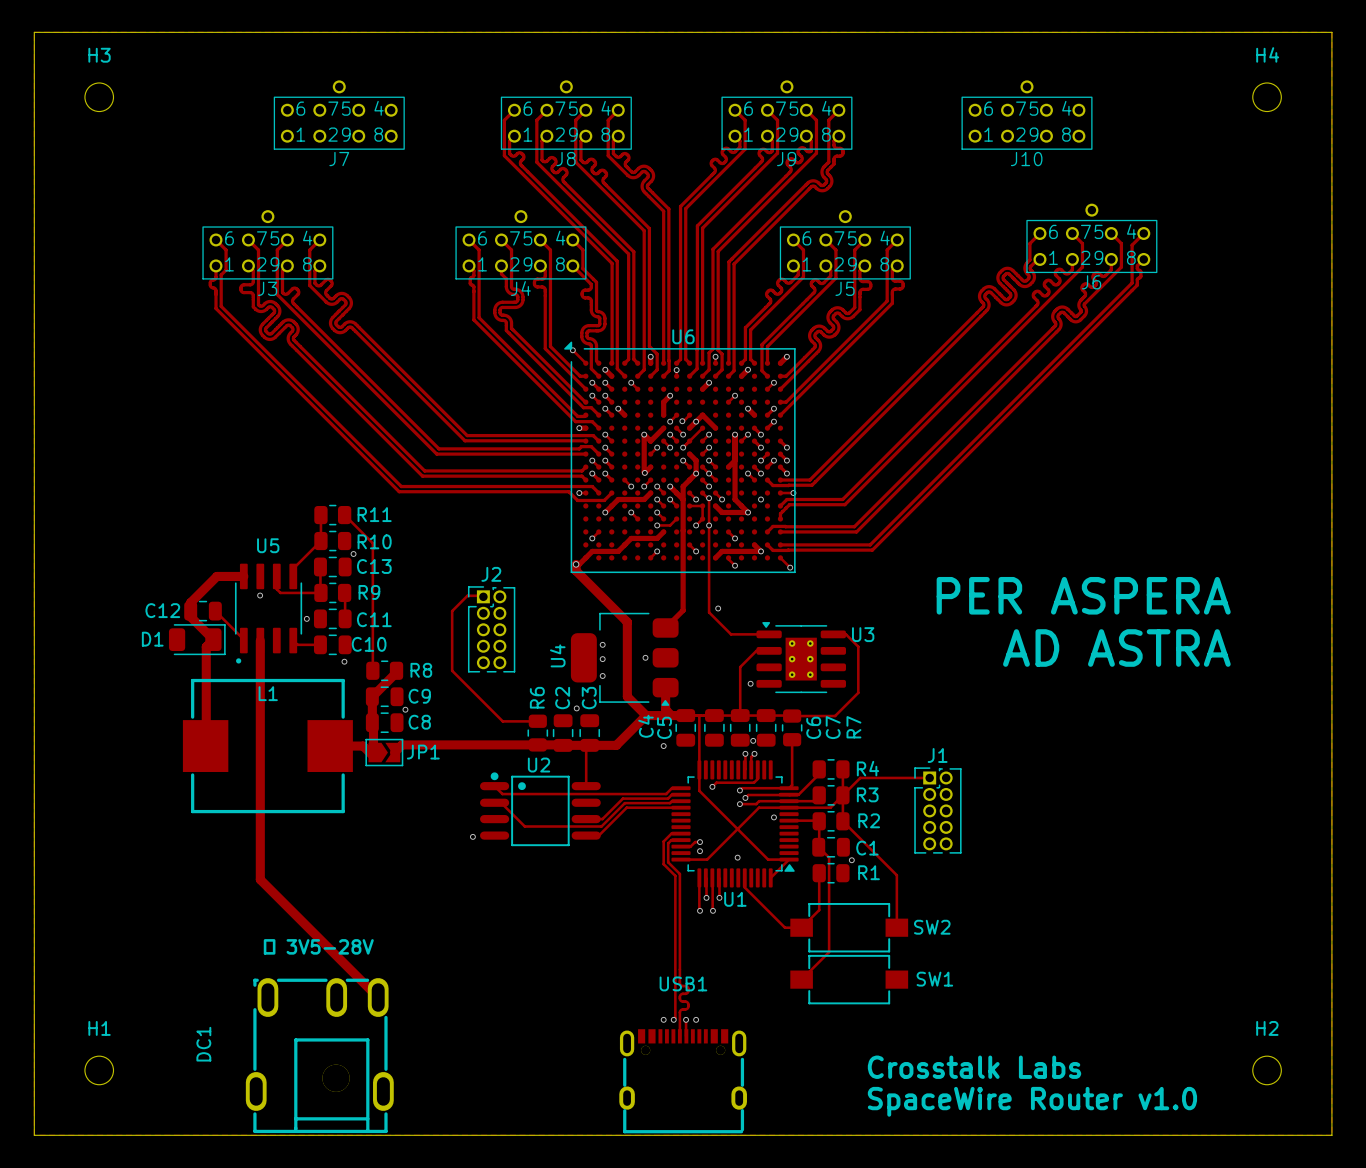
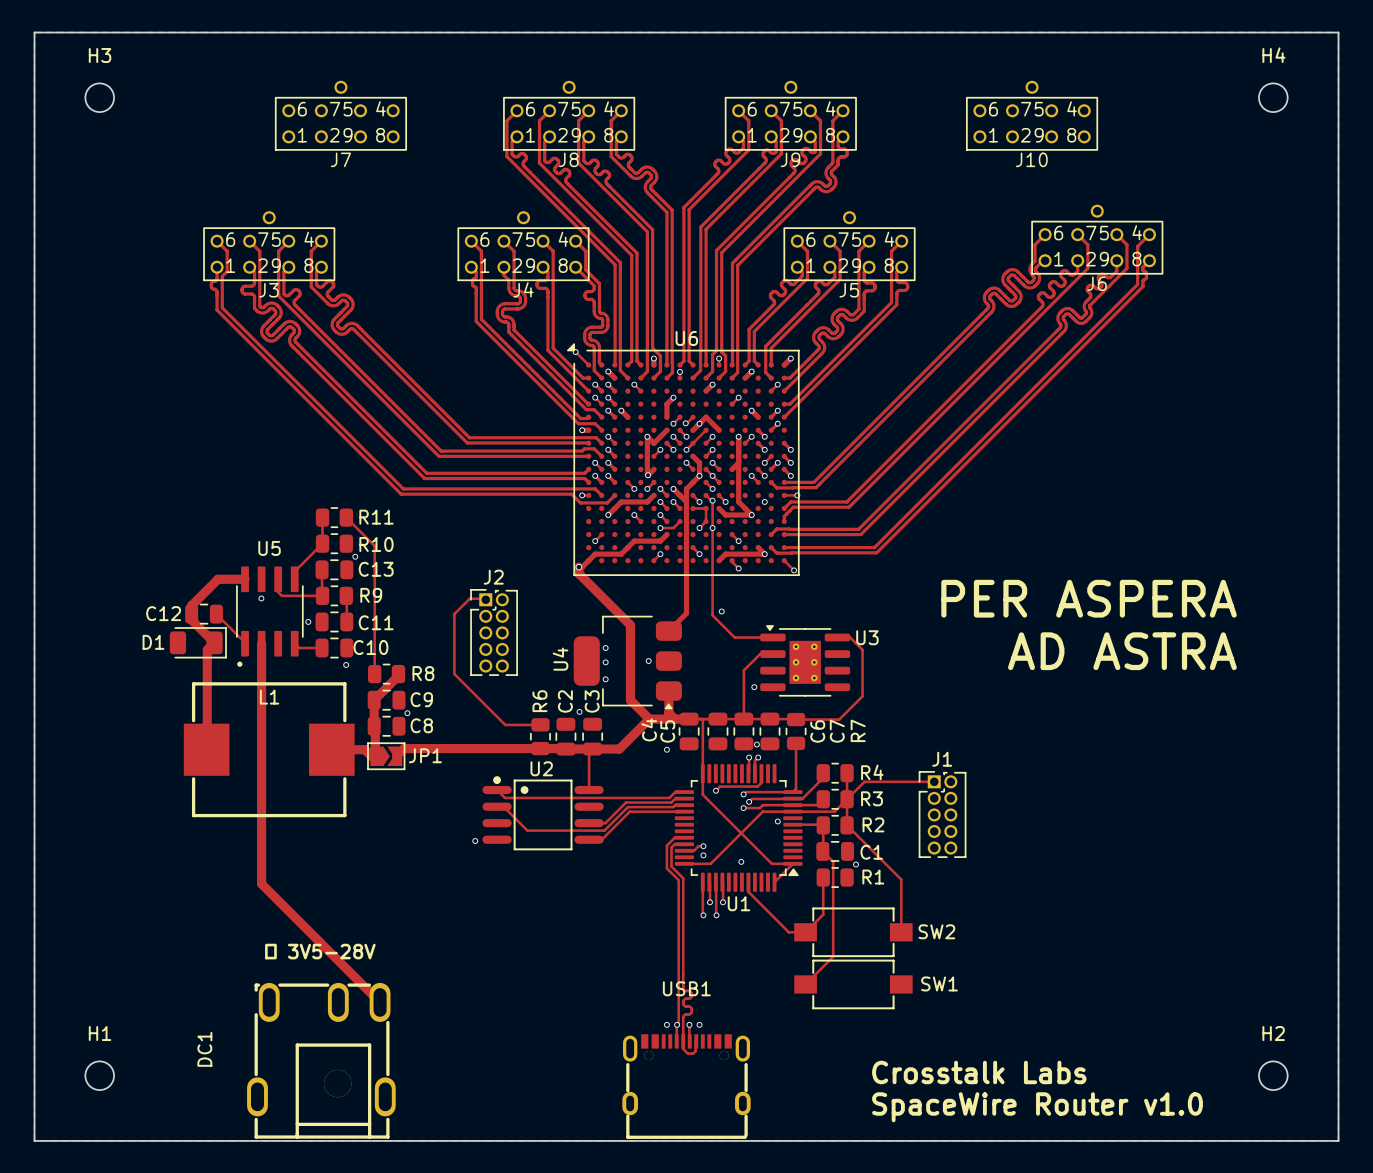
track: none -> (677, 1024) (676, 1041)
track: none -> (683, 1041) (683, 1049) (687, 1053) (693, 1053) (695, 1051) (696, 1041)

